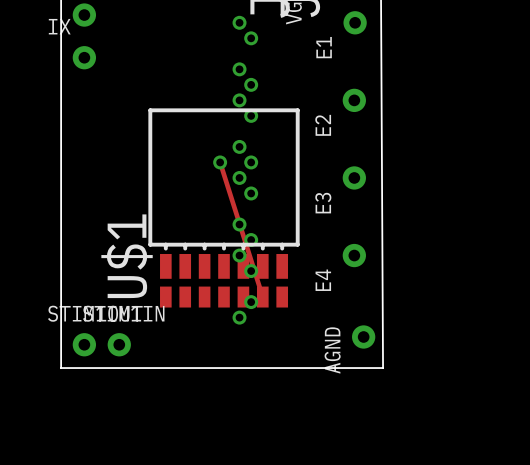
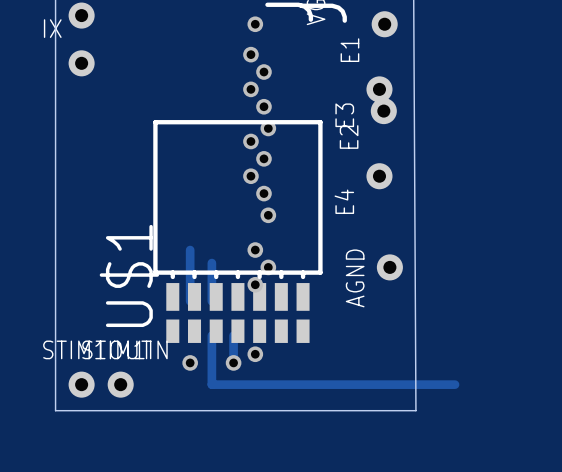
via: (251, 38) -> none
via: none -> (250, 54)
via: none -> (263, 72)
via: (239, 69) -> none
via: none -> (250, 89)
via: (251, 84) -> none
via: none -> (263, 106)
via: (239, 100) -> none
via: none -> (250, 141)
via: none -> (263, 158)
via: (239, 146) -> none
via: none -> (250, 176)
track: (220, 162) (262, 297) -> none
via: (220, 162) -> none
via: (251, 162) -> none
via: none -> (263, 193)
via: (239, 177) -> none
E3 position: (354, 177) -> (379, 89)
track: none -> (190, 250) (190, 301)
track: none -> (211, 263) (211, 301)
E4 position: (354, 255) -> (379, 176)
via: (251, 271) -> none
track: none -> (211, 335) (211, 384) (455, 384)
track: none -> (233, 335) (233, 362)
via: (251, 302) -> none
via: none -> (190, 362)
via: none -> (233, 362)
AGND position: (363, 336) -> (389, 267)

